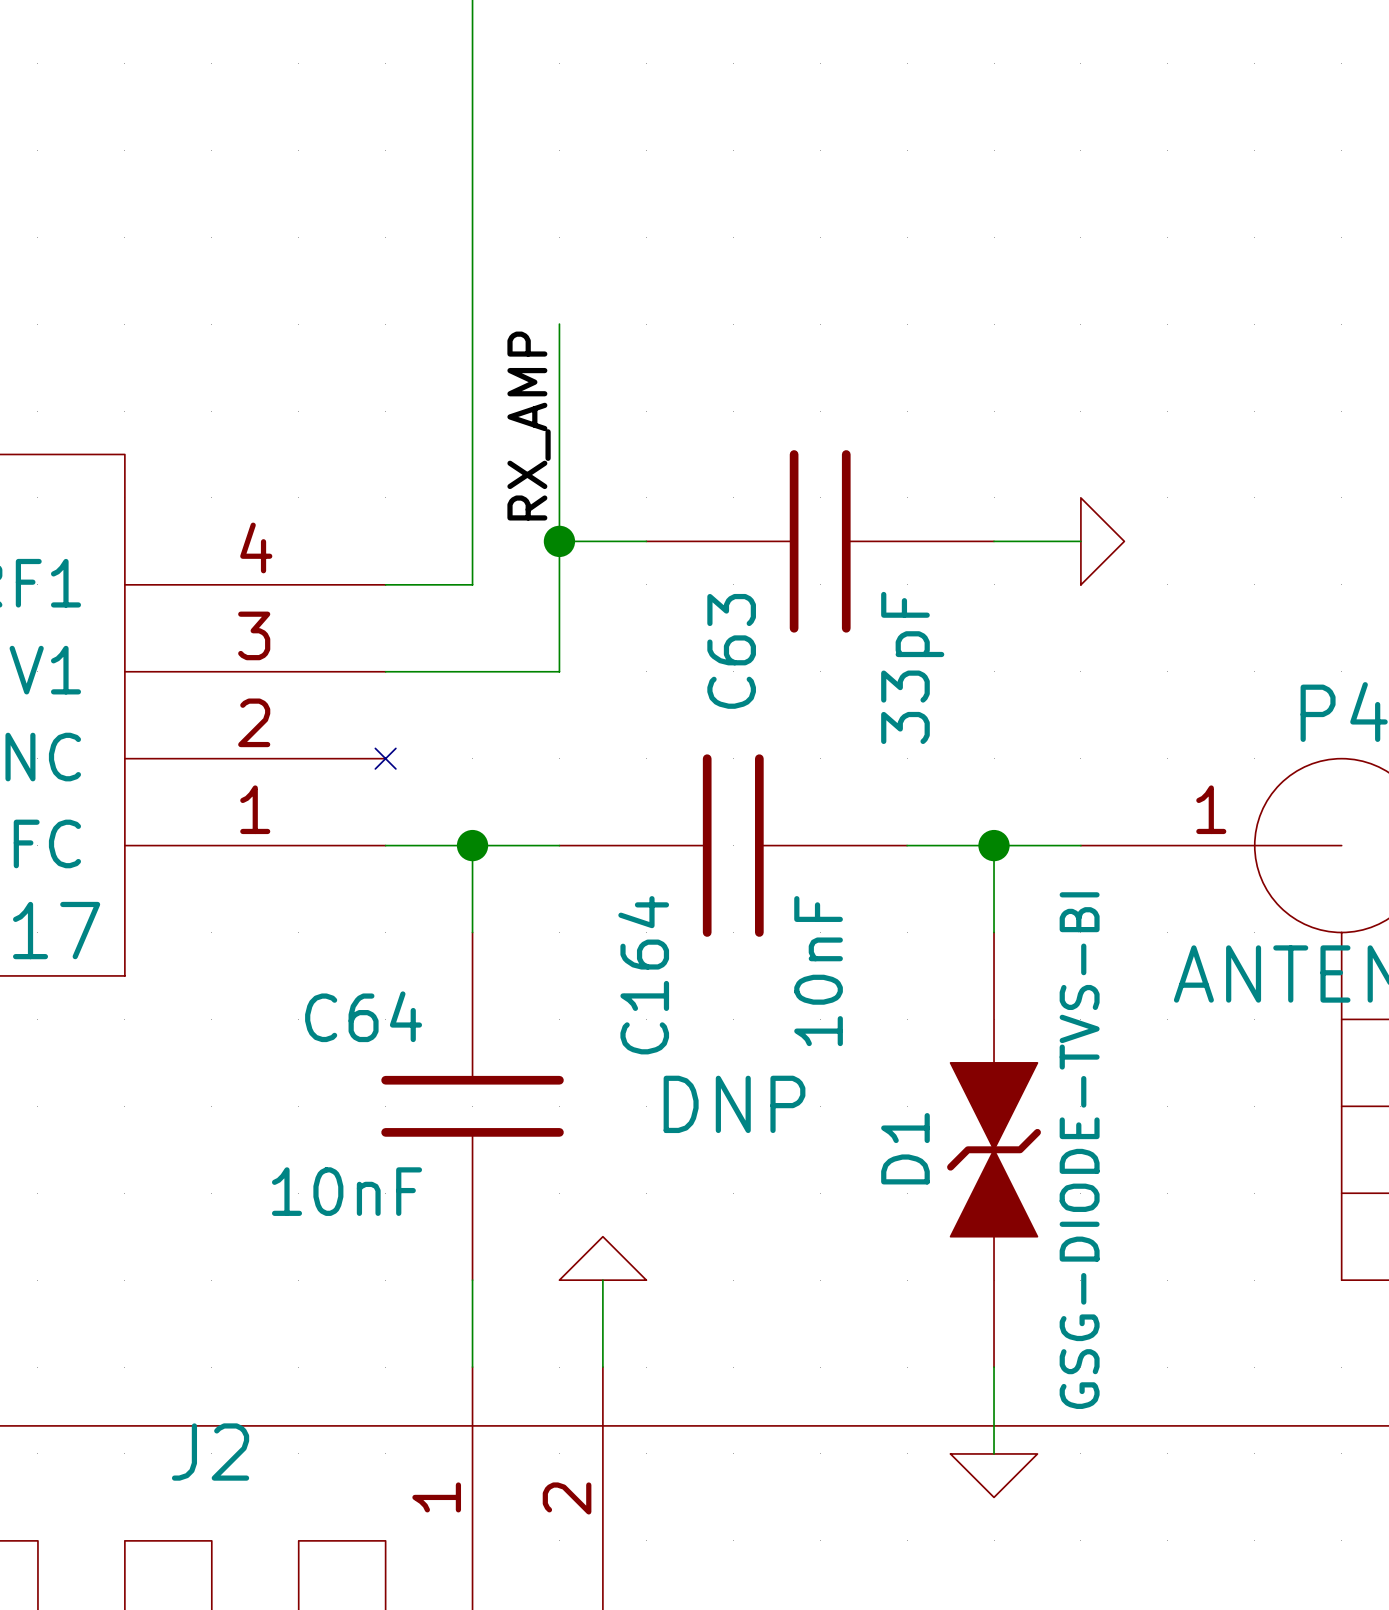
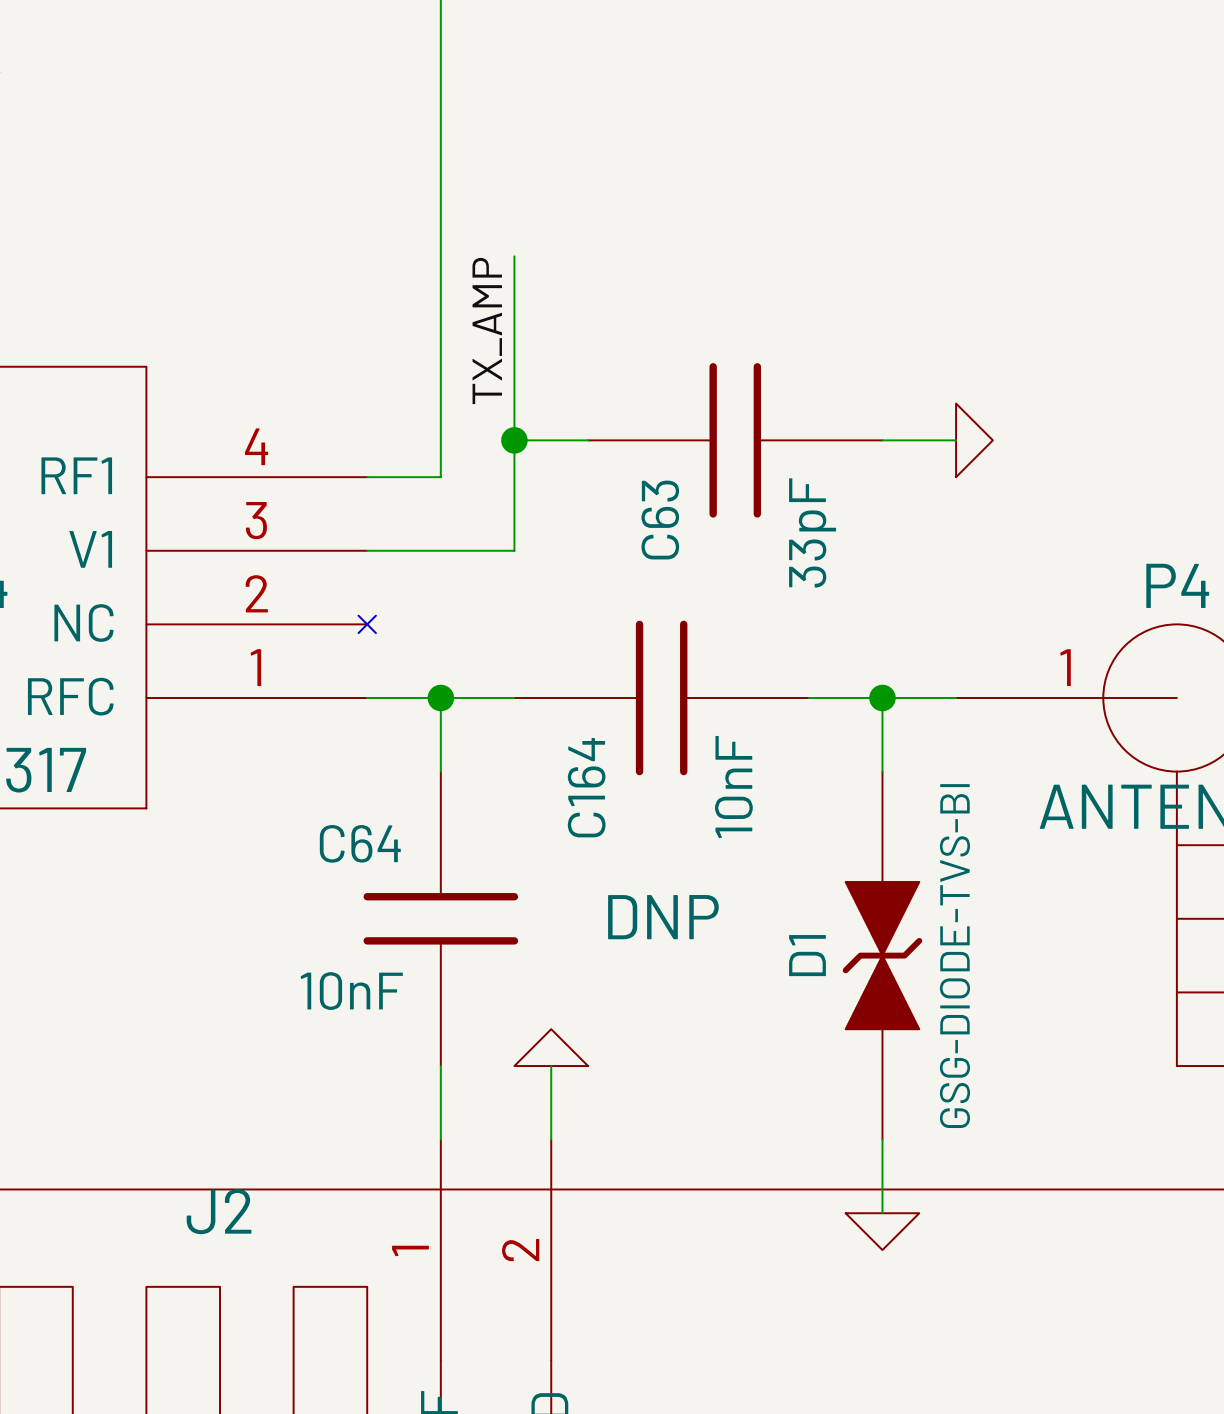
label: RX_AMP (529, 426) -> TX_AMP (487, 331)

